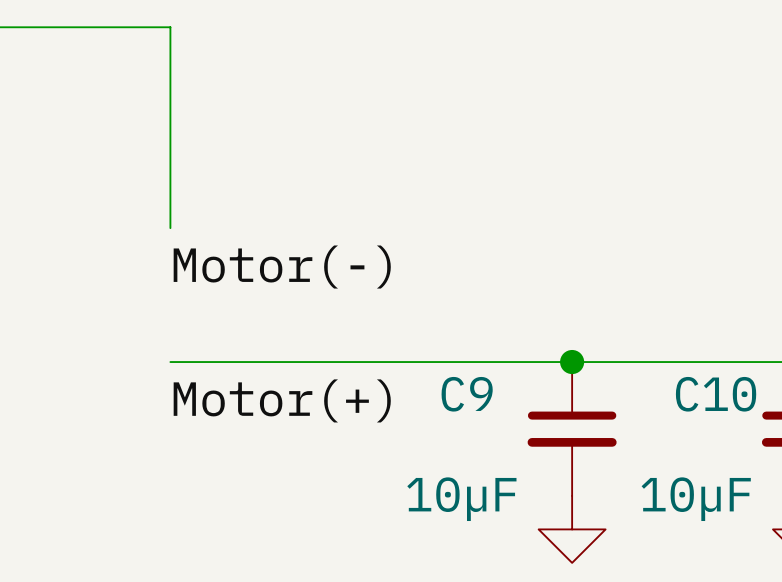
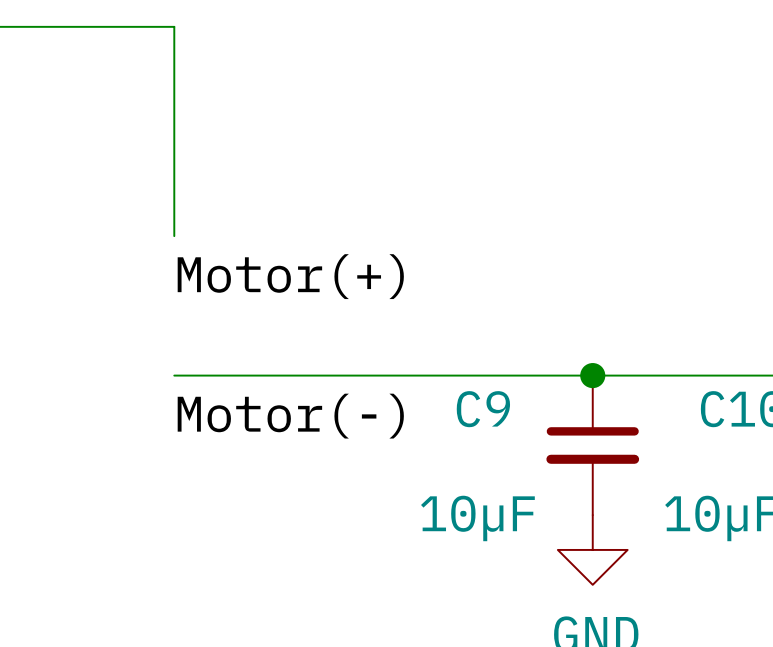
label: Motor(-) (282, 267) -> Motor(+) (290, 276)
label: Motor(+) (282, 400) -> Motor(-) (290, 416)

